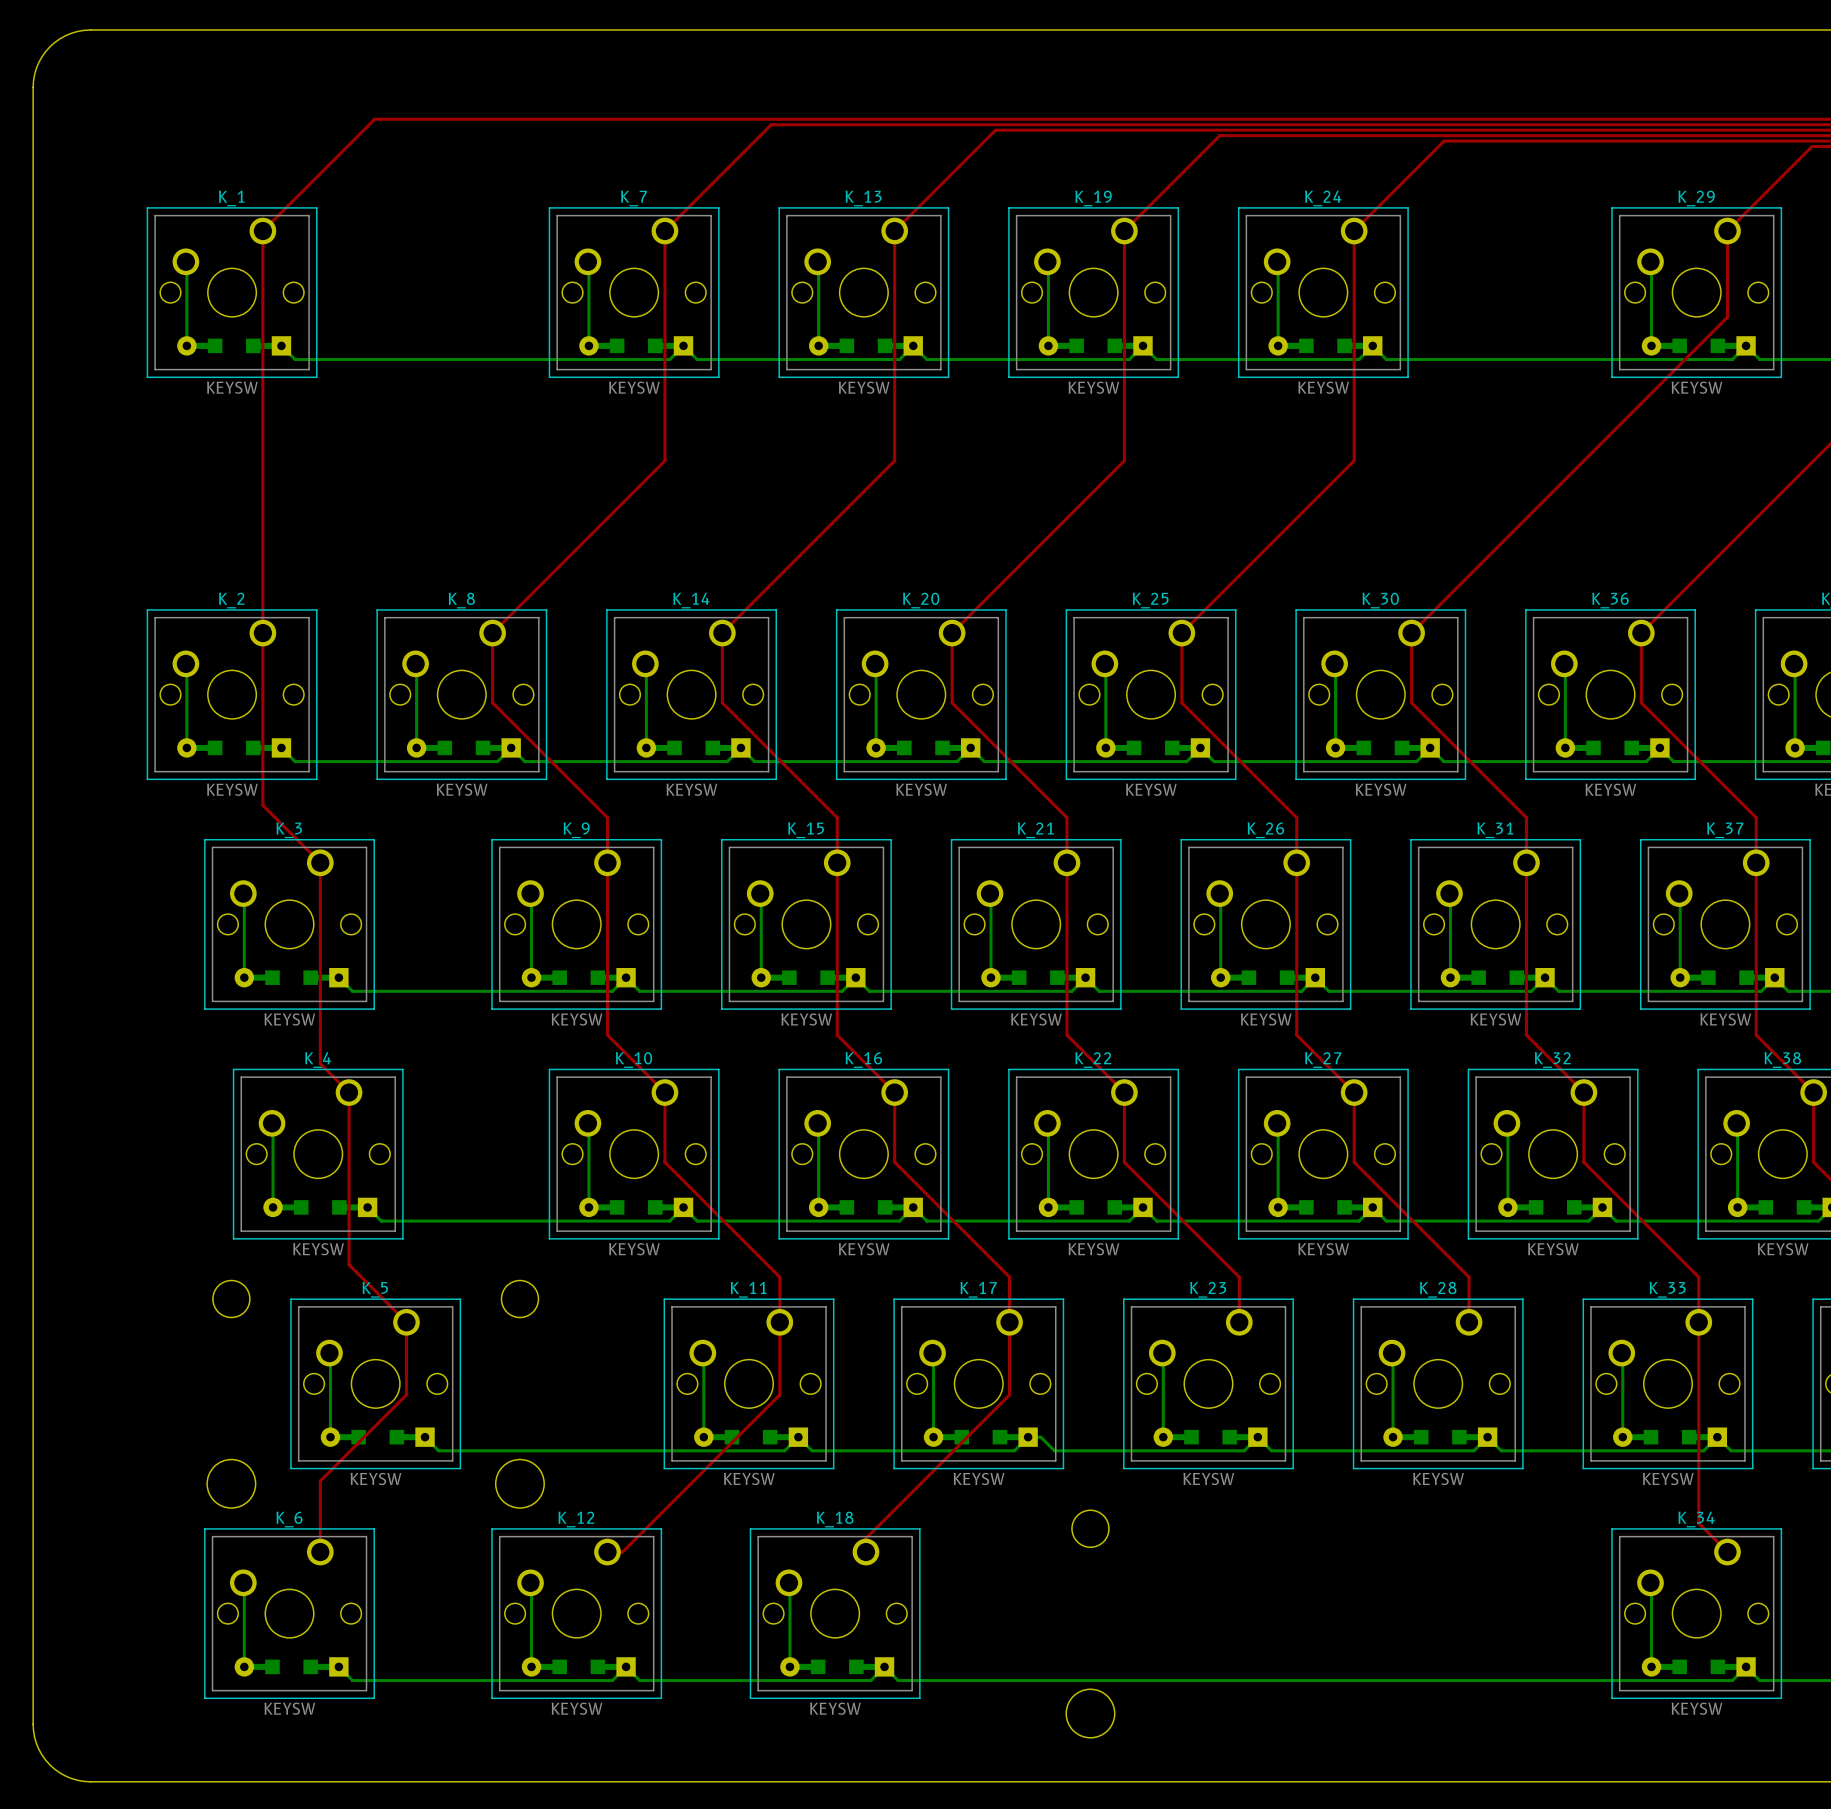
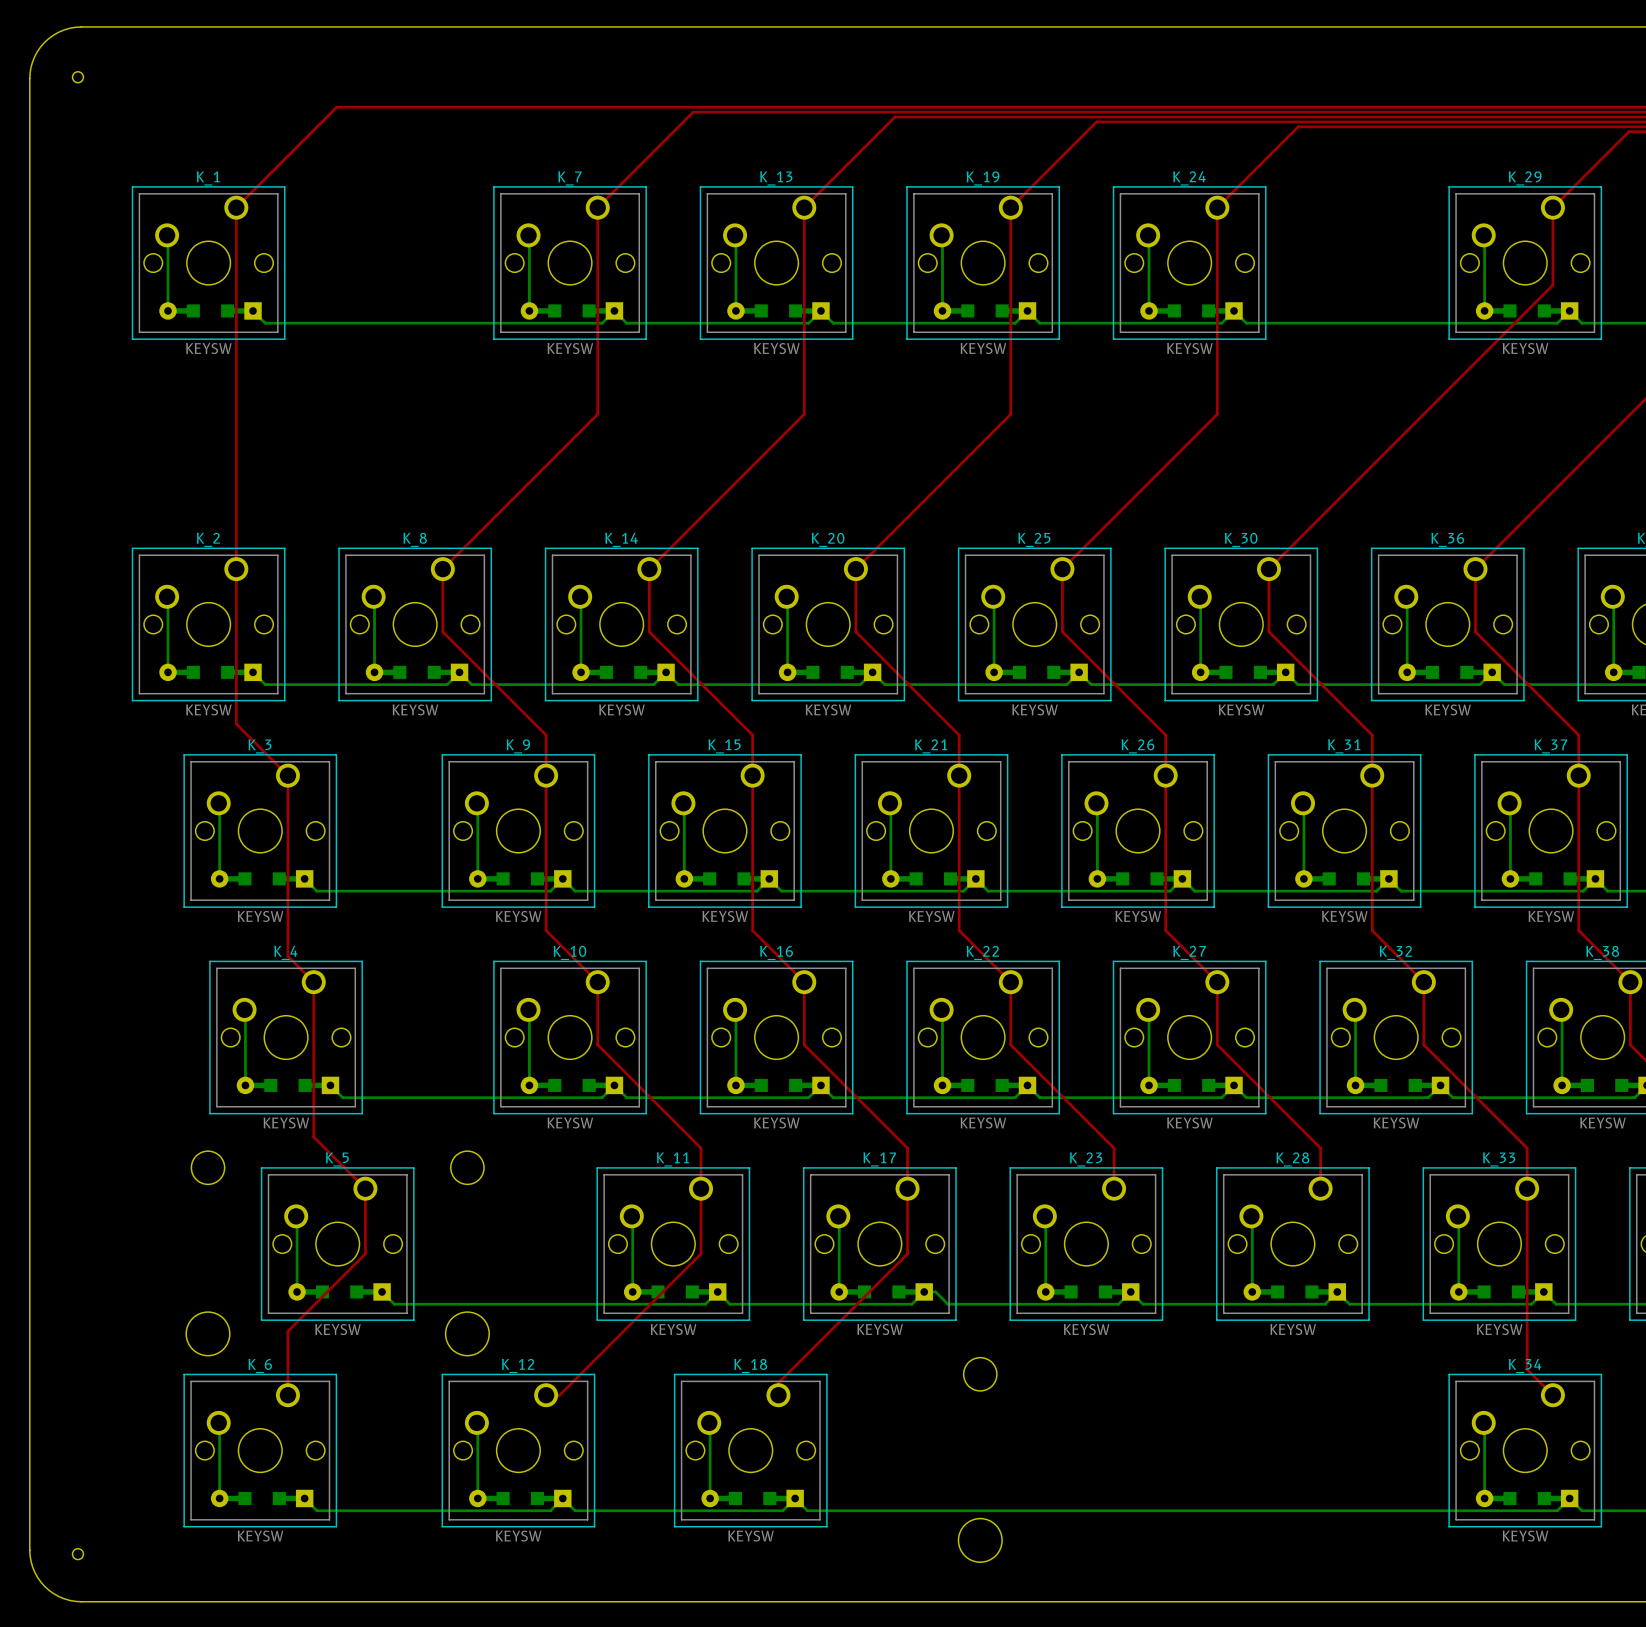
round board edge: none -> [72, 71, 84, 83]
round board edge: none -> [72, 1548, 84, 1560]

